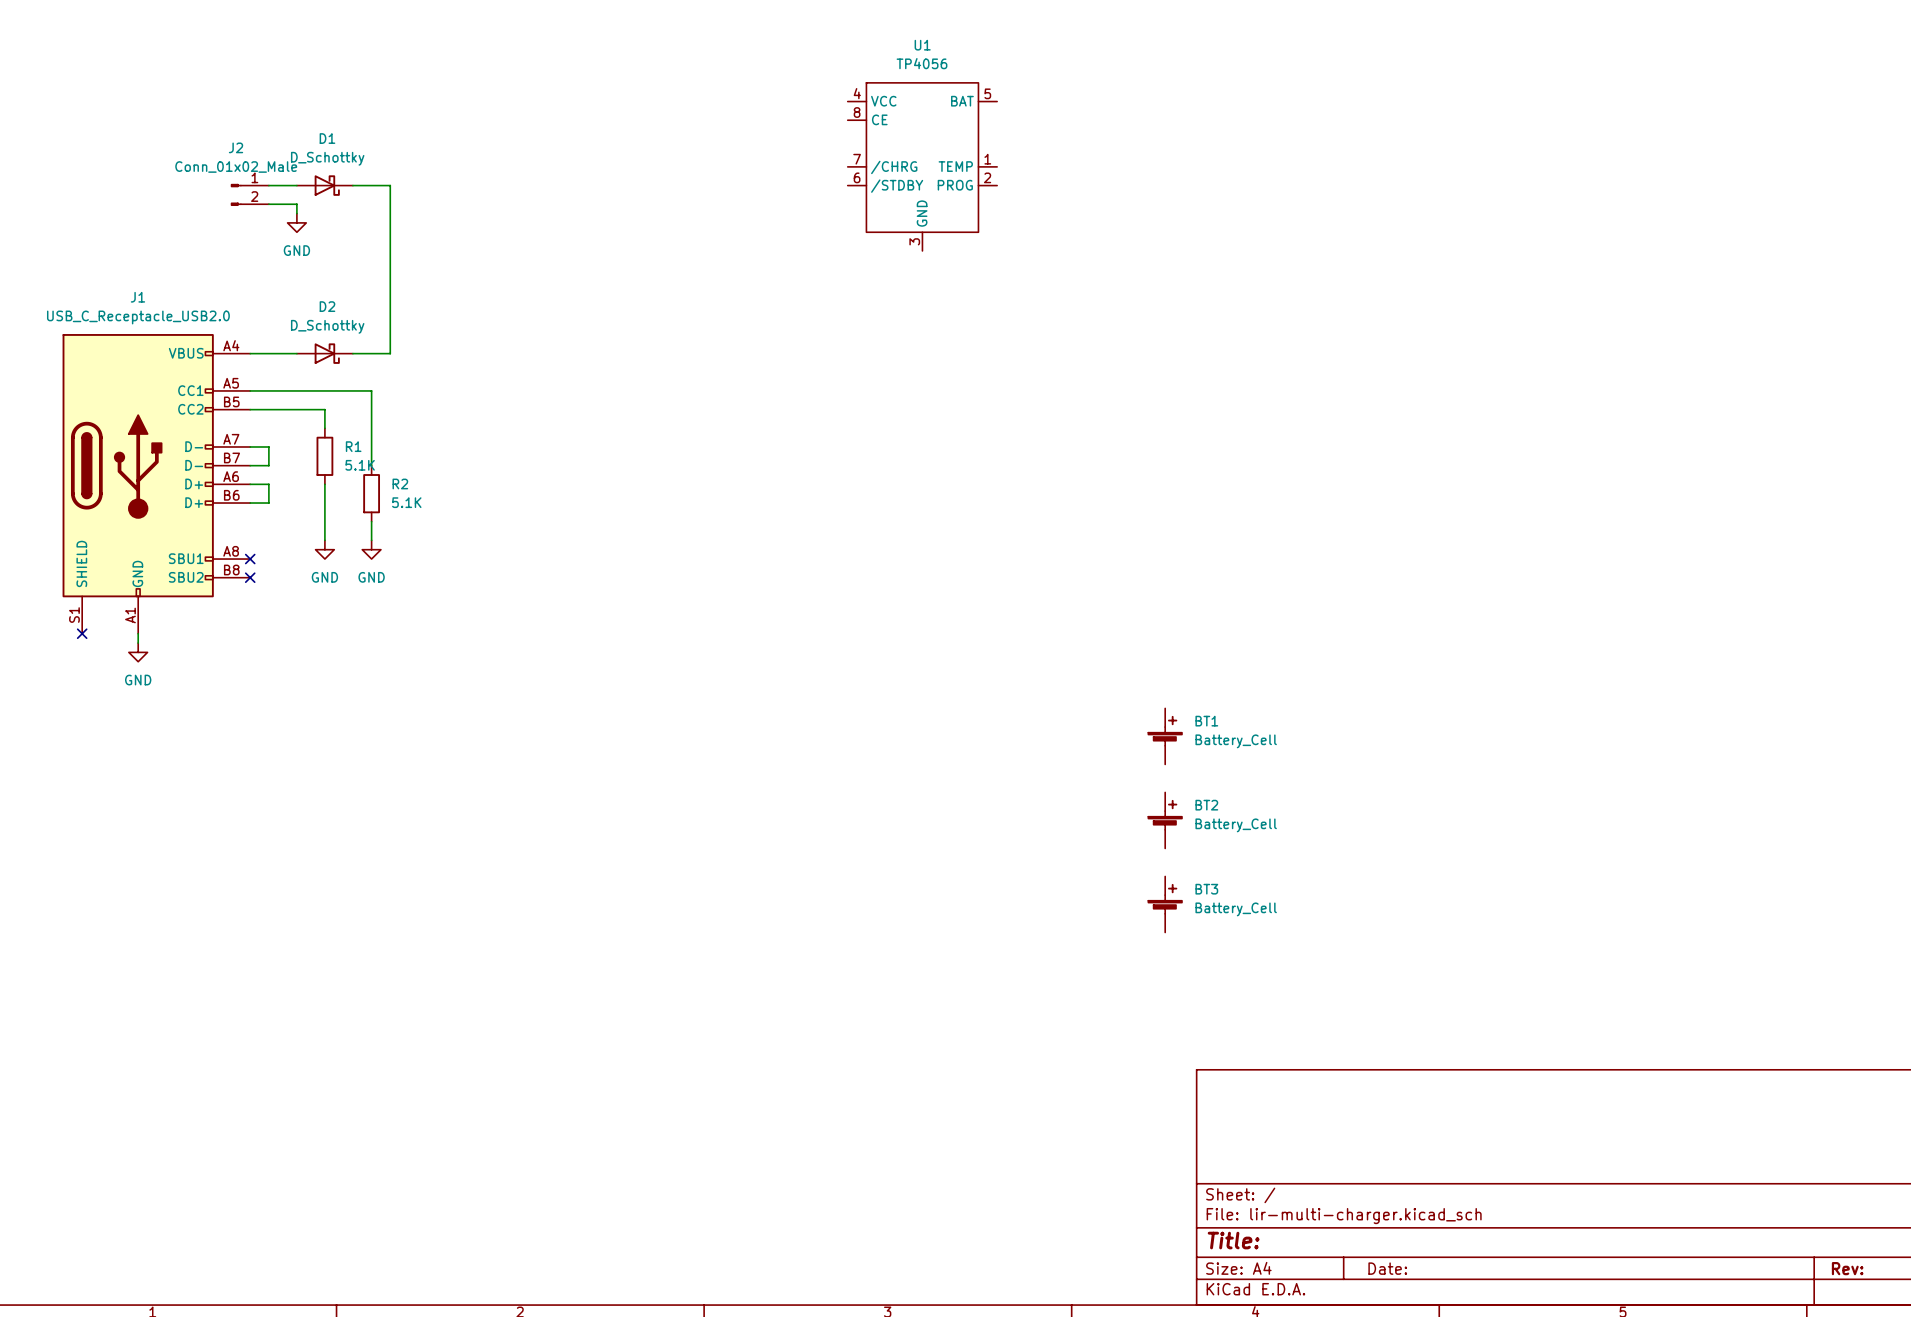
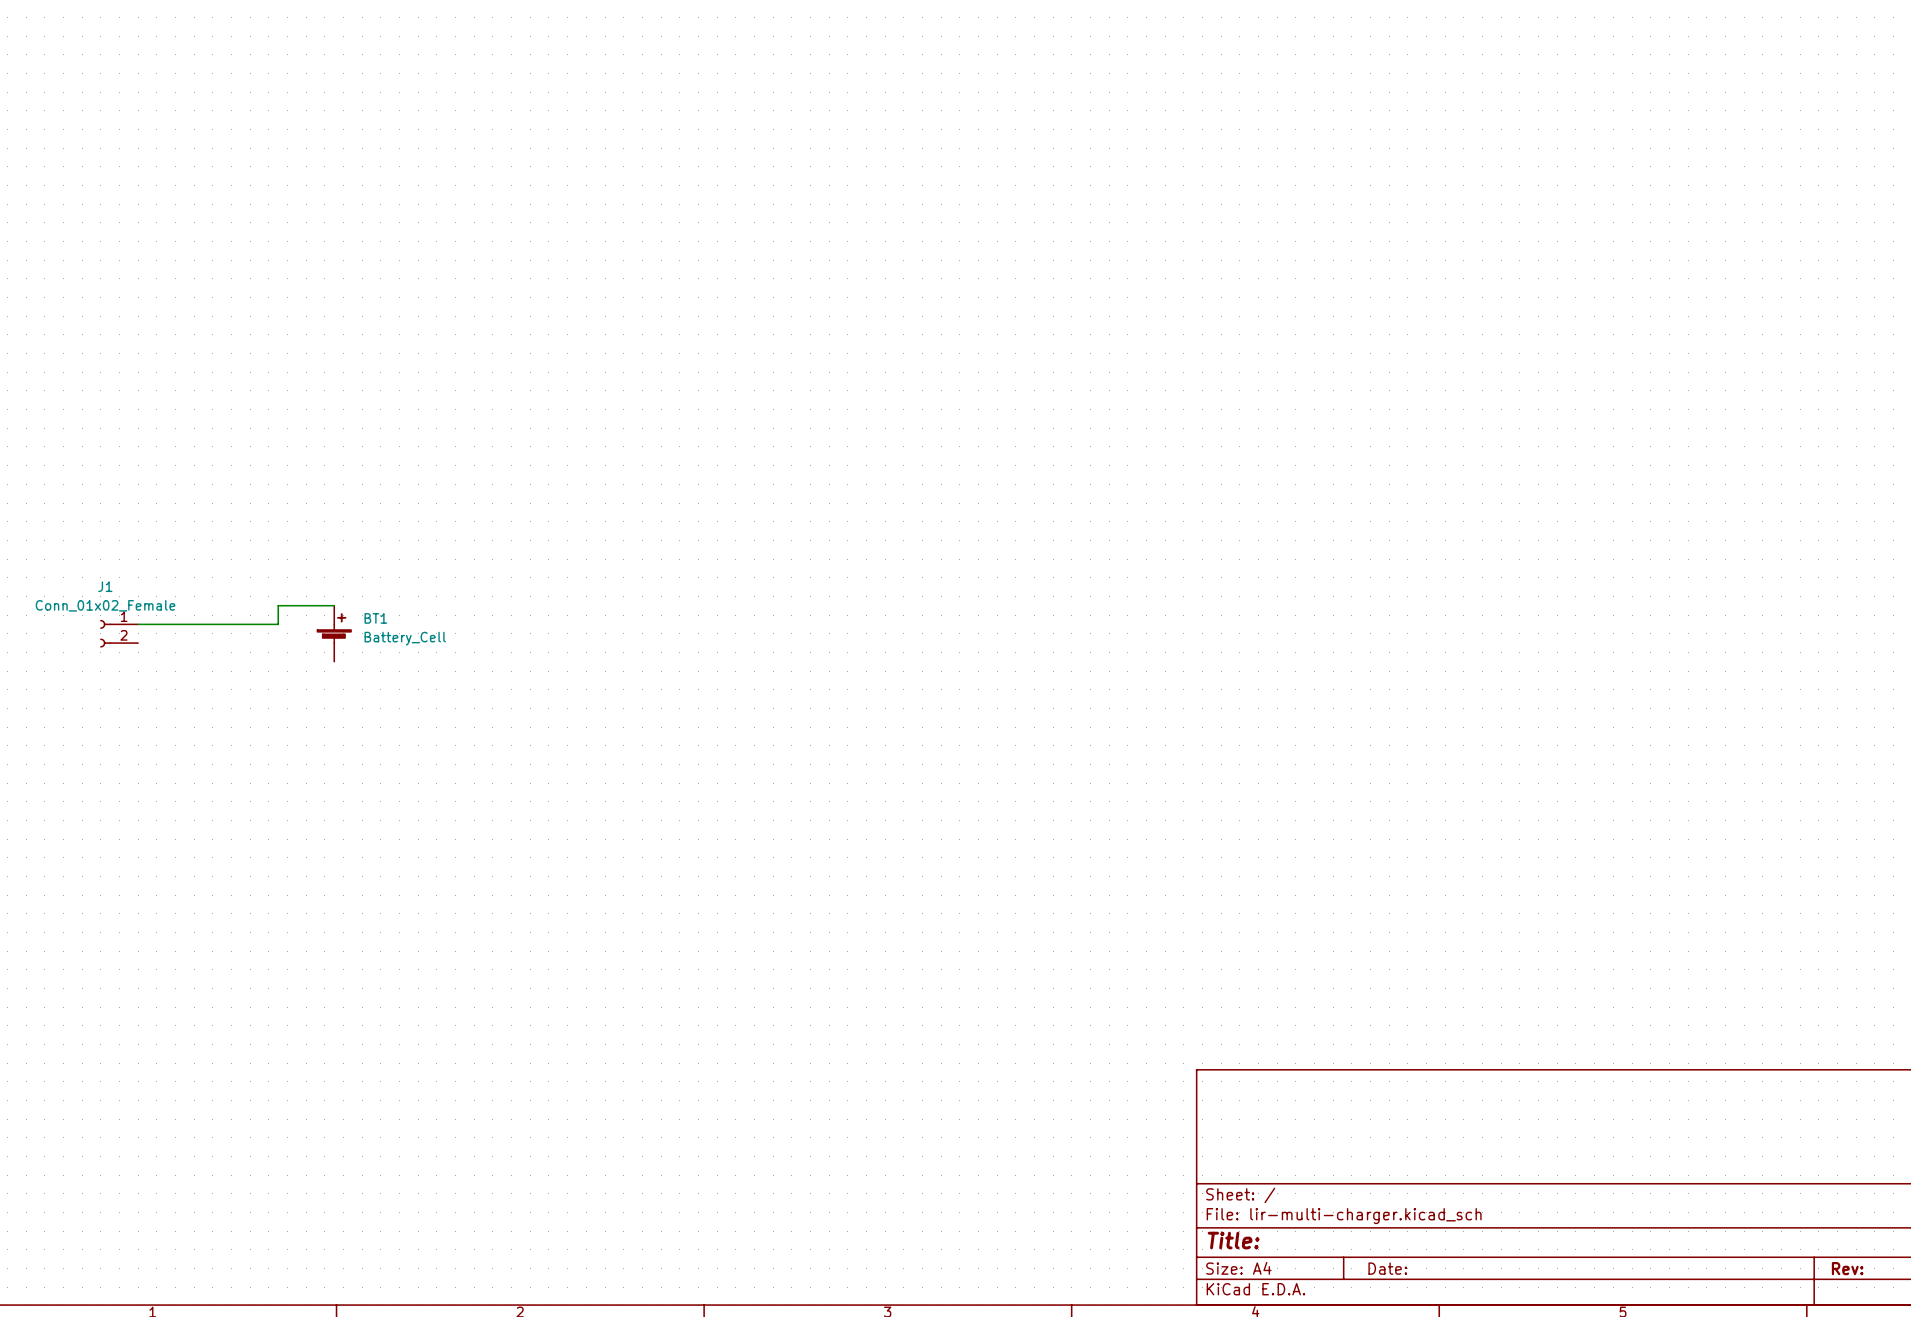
U1: TP4056 (922, 166) -> none
wire: (268, 185) (296, 185) -> none
D1: D_Schottky (324, 185) -> none
wire: (352, 185) (390, 185) (390, 353) (352, 353) -> none
J2: Conn_01x02_Male (249, 194) -> none
wire: (268, 204) (296, 204) (296, 213) -> none
power symbol: GND (296, 222) -> none
J1 name position: J1 (137, 297) -> J1 (105, 586)
J1 value: USB_C_Receptacle_USB2.0 (138, 317) -> Conn_01x02_Female (105, 605)
J1 symbol: [62, 334, 251, 634] -> [100, 620, 139, 648]
wire: (250, 353) (296, 353) -> none
D2: D_Schottky (324, 353) -> none
wire: (250, 390) (371, 390) (371, 465) -> none
wire: (250, 409) (324, 409) (324, 428) -> none
wire: (250, 446) (268, 446) (268, 465) (250, 465) -> none
R1: 5.1K (324, 456) -> none
wire: (250, 484) (268, 484) (268, 503) (250, 503) -> none
wire: (324, 484) (324, 540) -> none
R2: 5.1K (371, 493) -> none
wire: (371, 521) (371, 540) -> none
power symbol: GND (324, 549) -> none
power symbol: GND (371, 549) -> none
no-connect mark: (250, 559) -> none
no-connect mark: (250, 577) -> none
wire: none -> (334, 605) (278, 605) (278, 624) (138, 624)
no-connect mark: (82, 633) -> none
wire: (138, 633) (138, 643) -> none
power symbol: GND (138, 652) -> none
BT1 position: (1165, 736) -> (334, 633)
BT2: Battery_Cell (1165, 820) -> none
BT3: Battery_Cell (1165, 904) -> none

